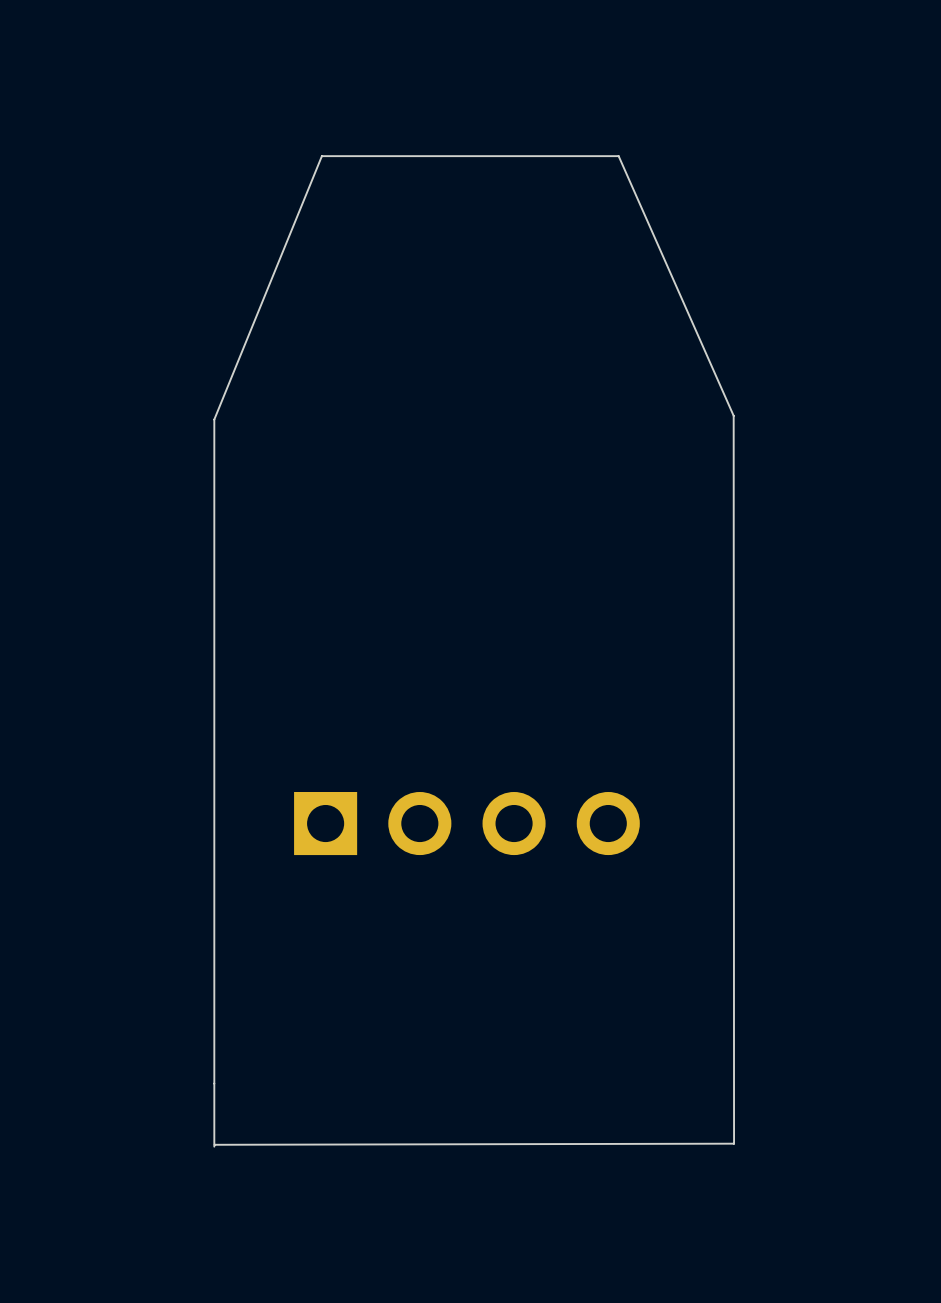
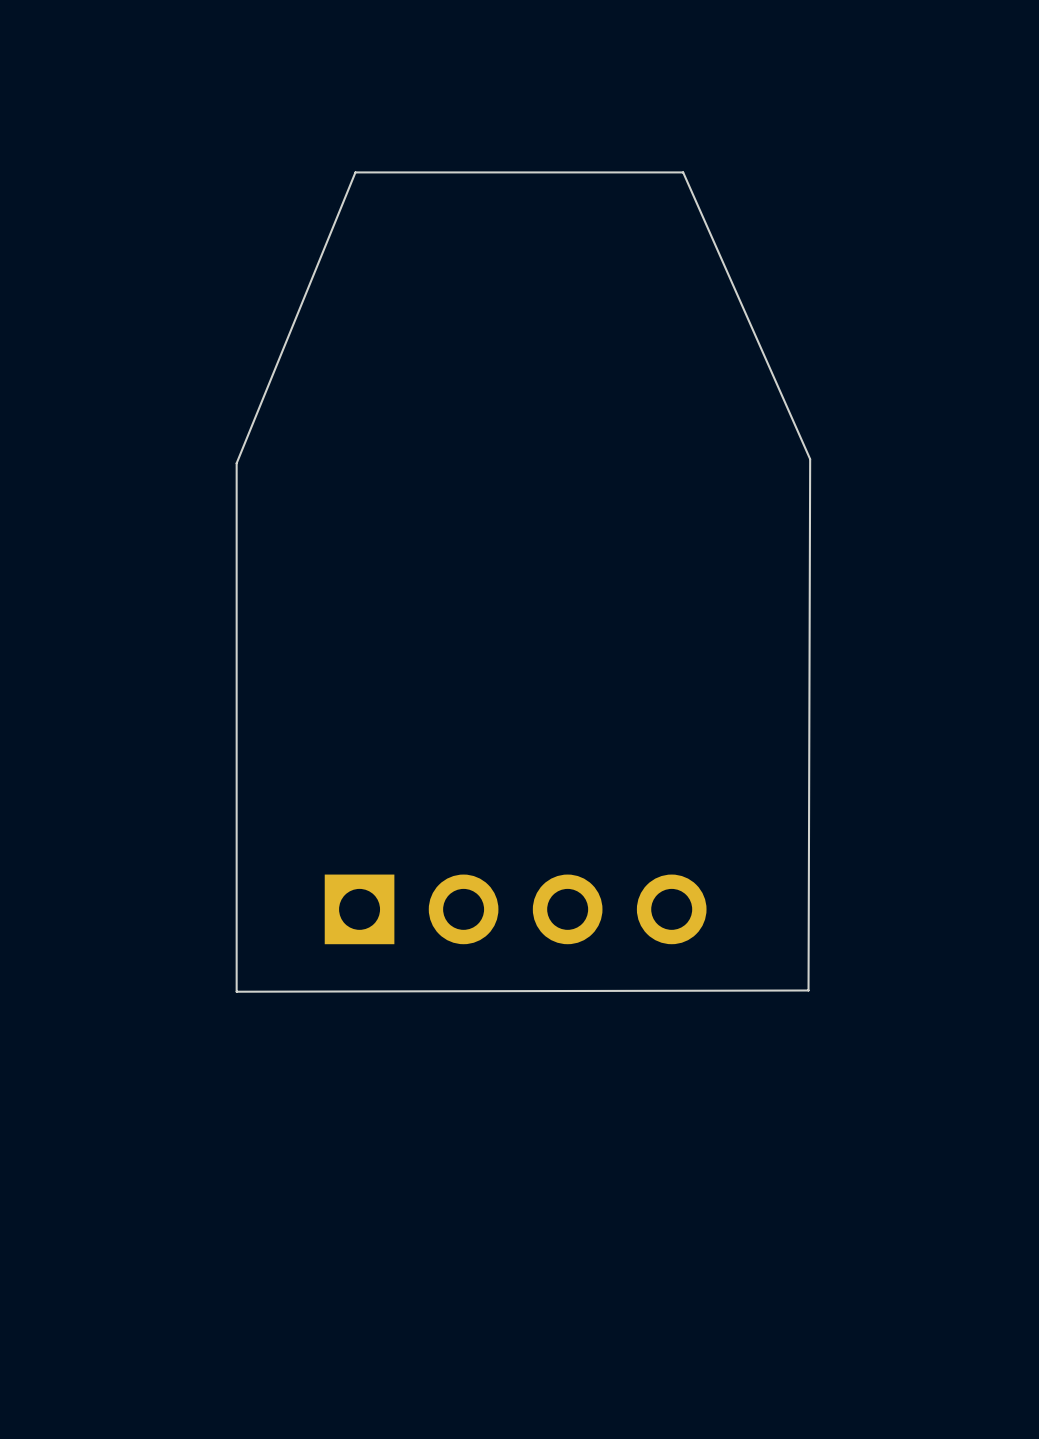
board edge: (733, 415) (734, 1143) (214, 1144) -> (810, 459) (808, 990) (236, 991)
board edge: (214, 898) (214, 1146) -> none

